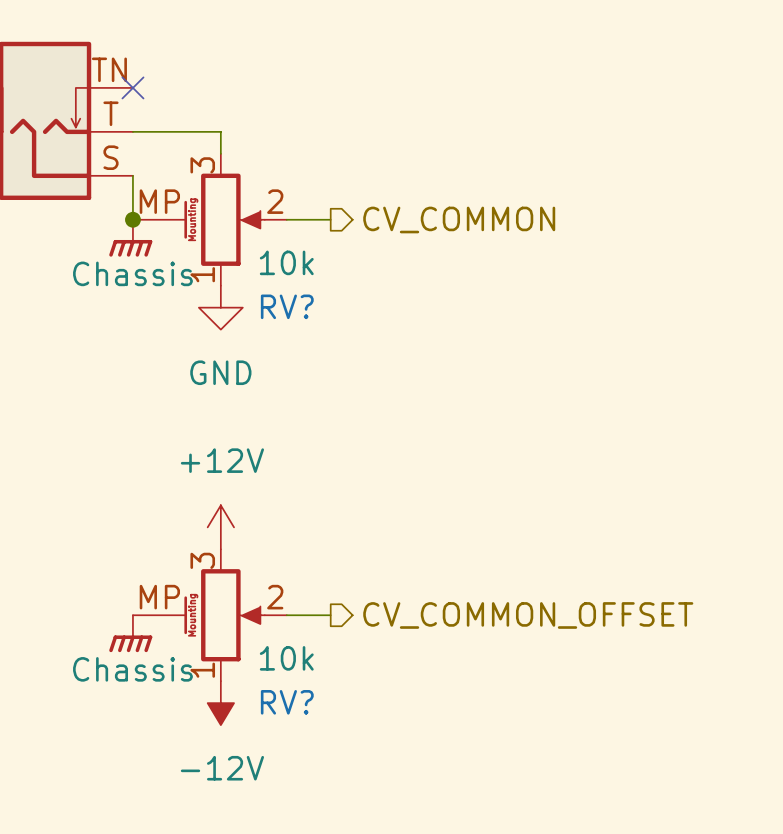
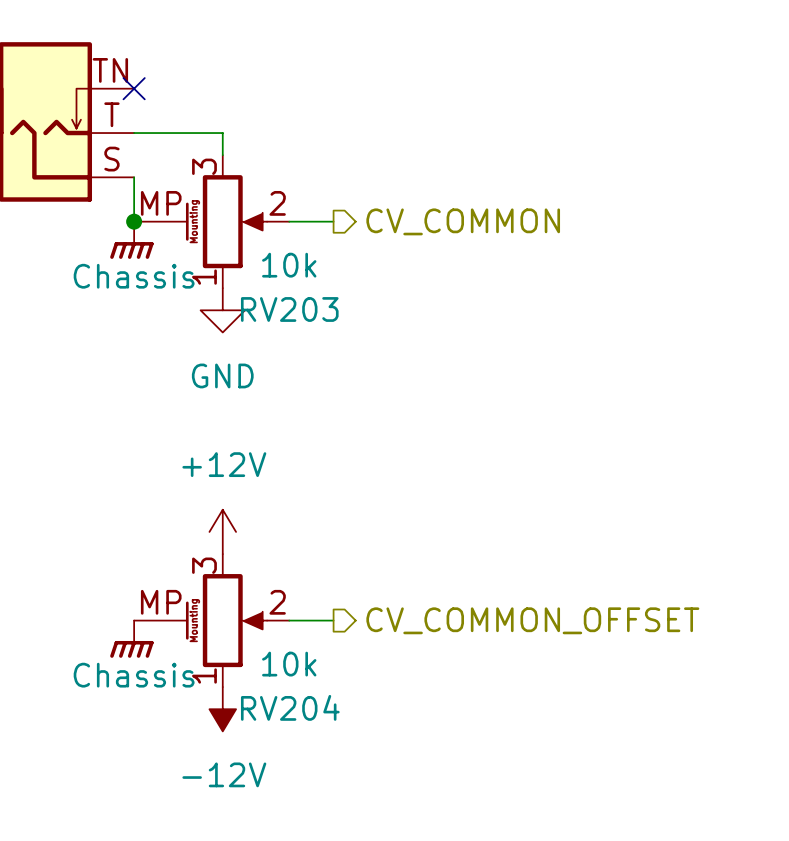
RV? name: RV? (287, 306) -> RV203 (289, 309)
RV? name: RV? (287, 702) -> RV204 (290, 707)

